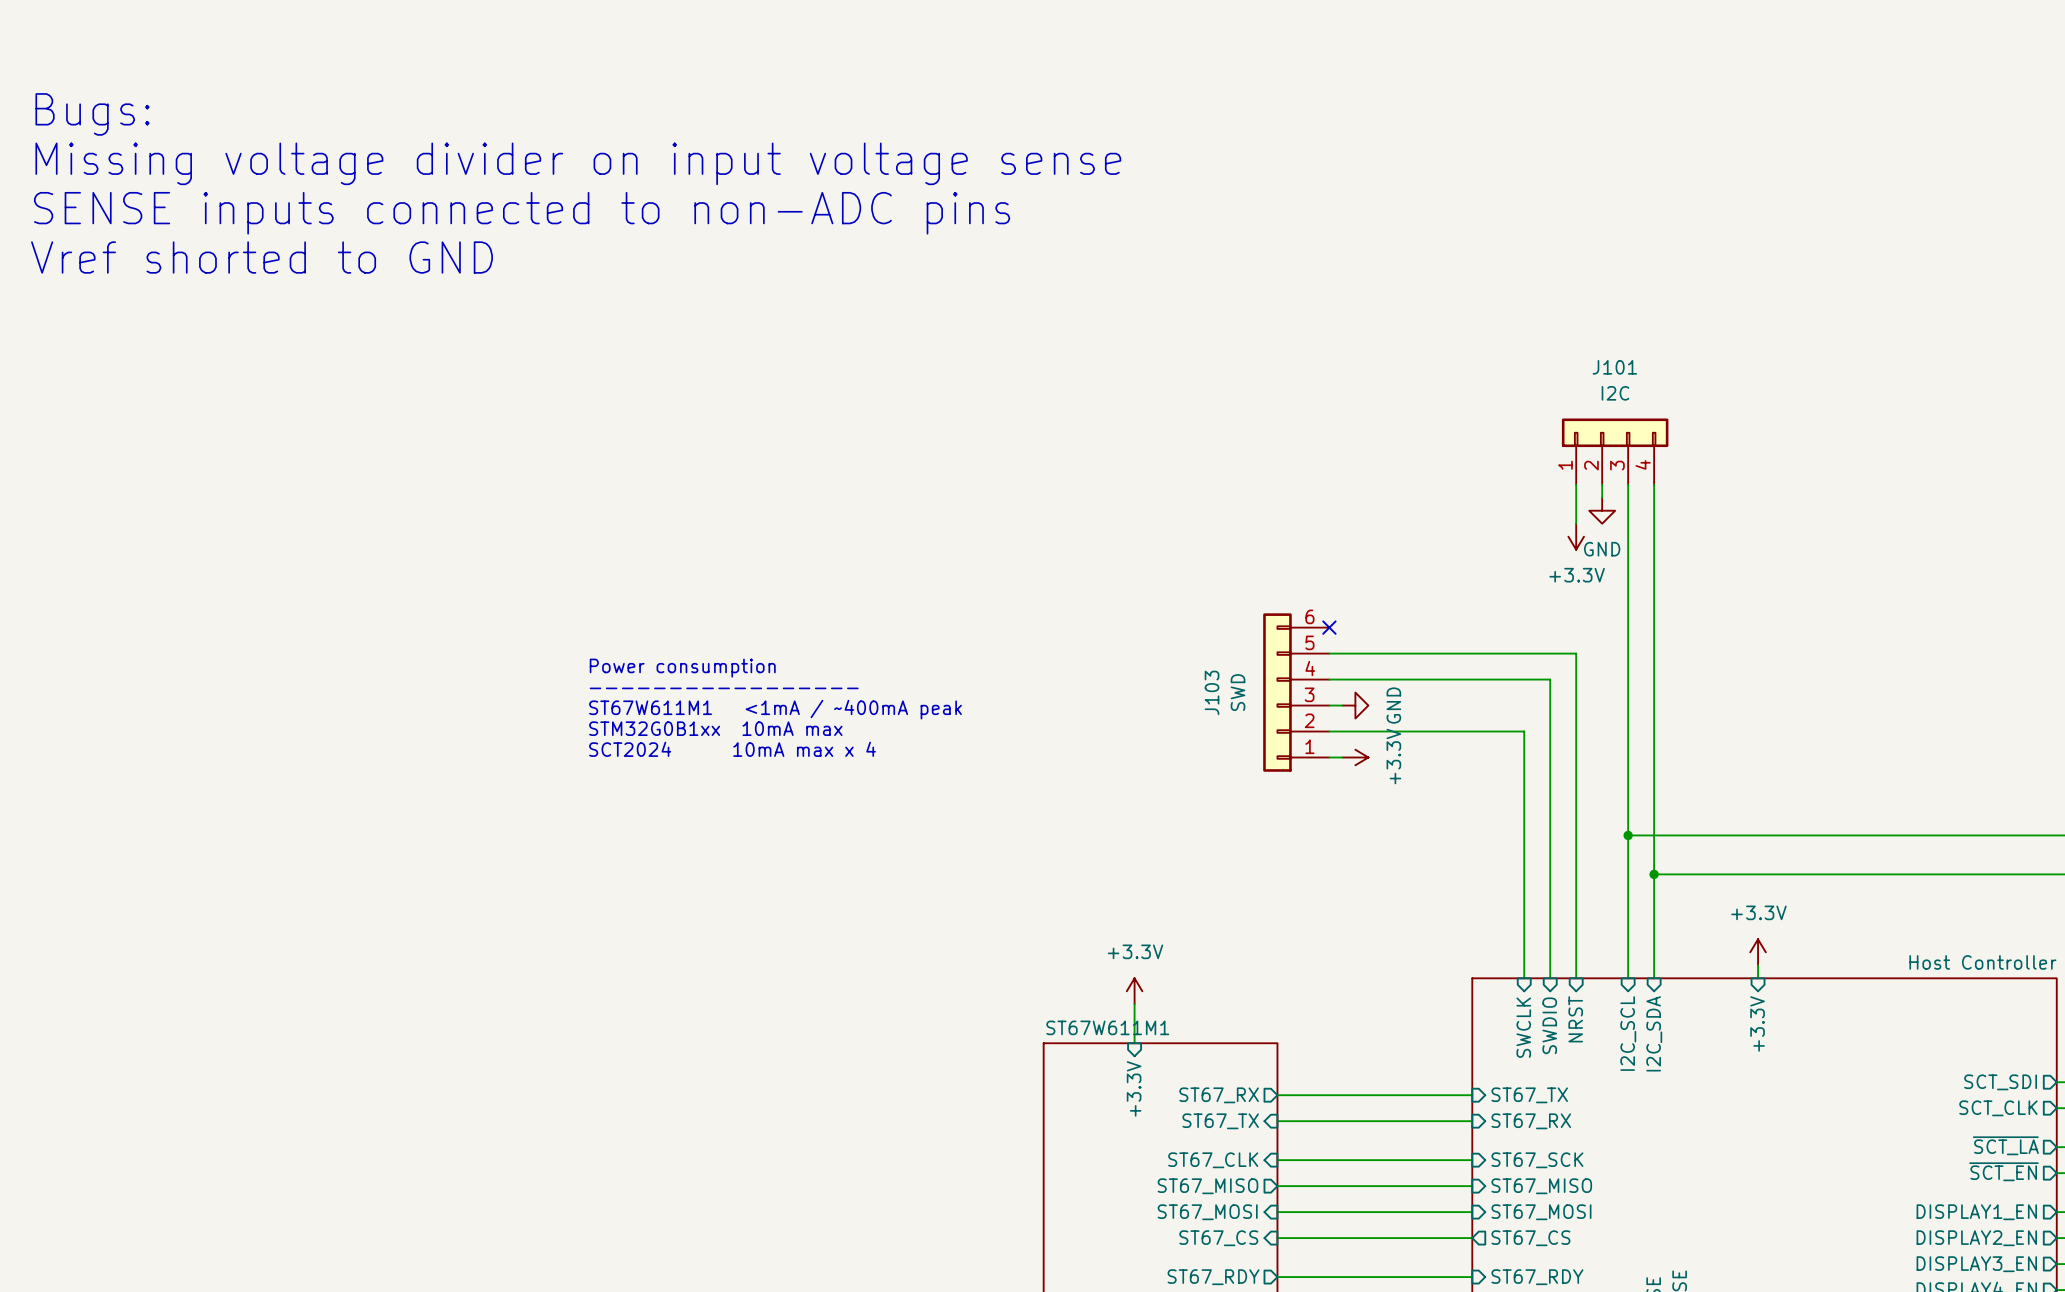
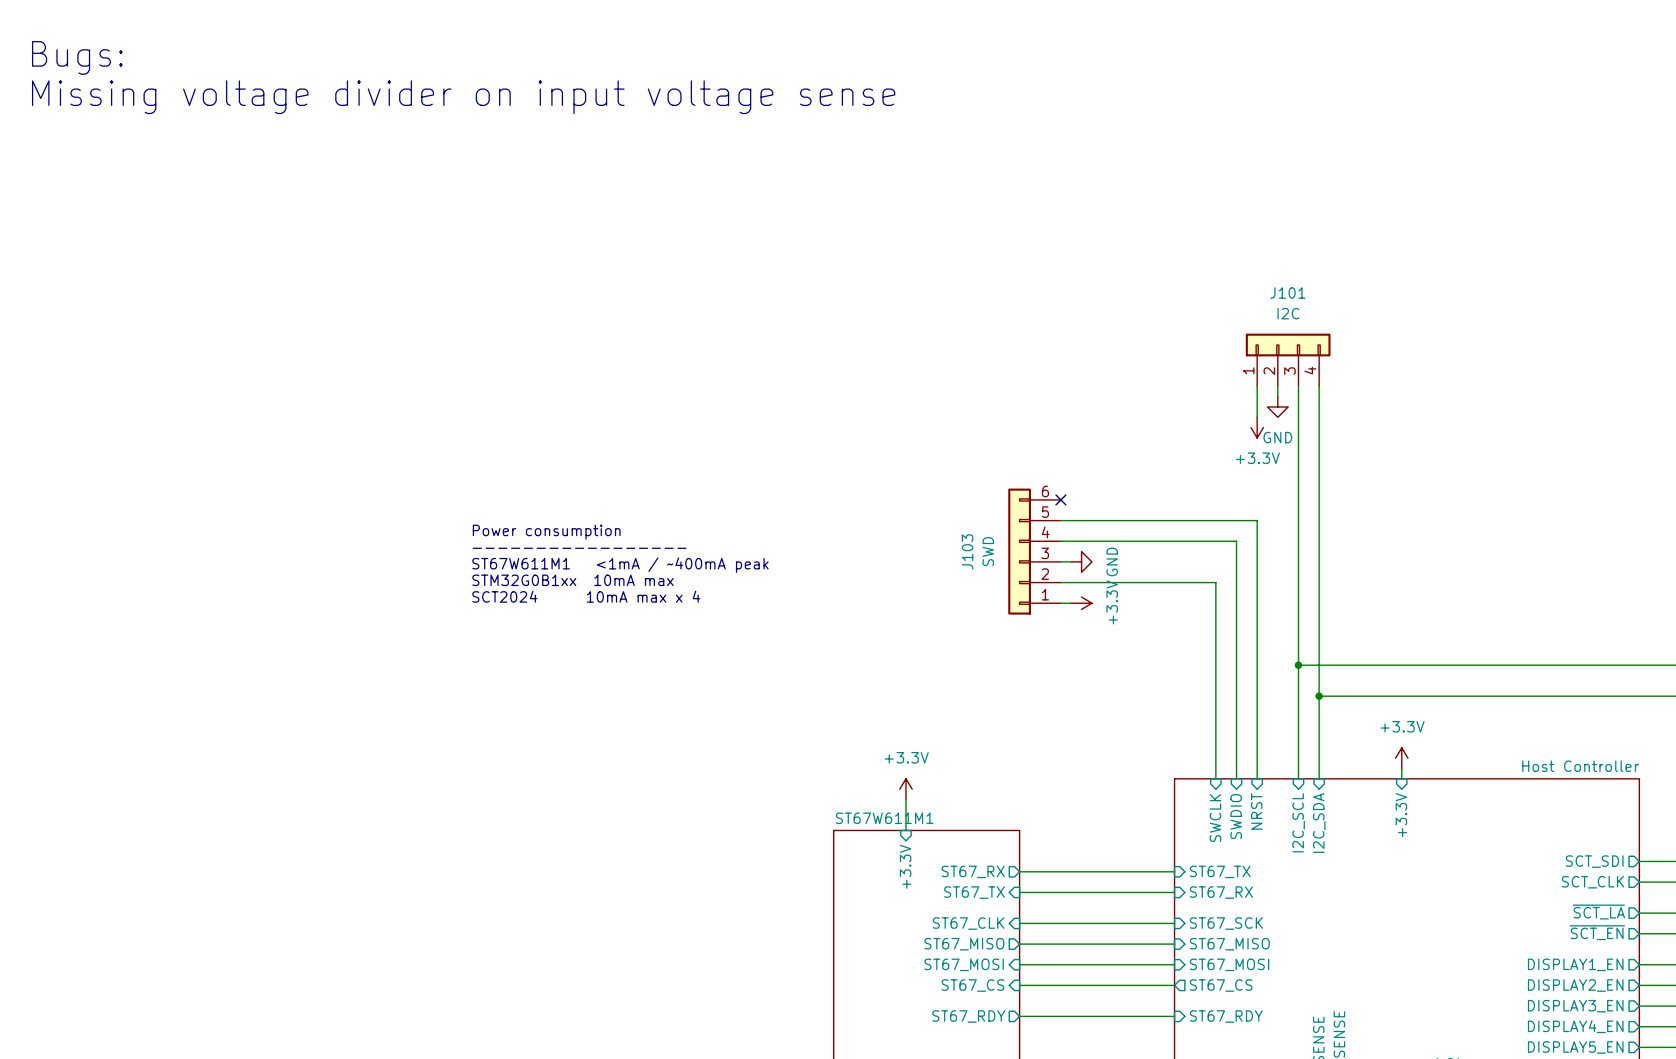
text position: Bugs: (92, 114) -> Bugs: (77, 57)
text position: Missing voltage divider on input voltage sense (578, 163) -> Missing voltage divider on input voltage sense (463, 97)
text: SENSE inputs connected to non-ADC pins (522, 213) -> none
text: Vref shorted to GND (262, 257) -> none

